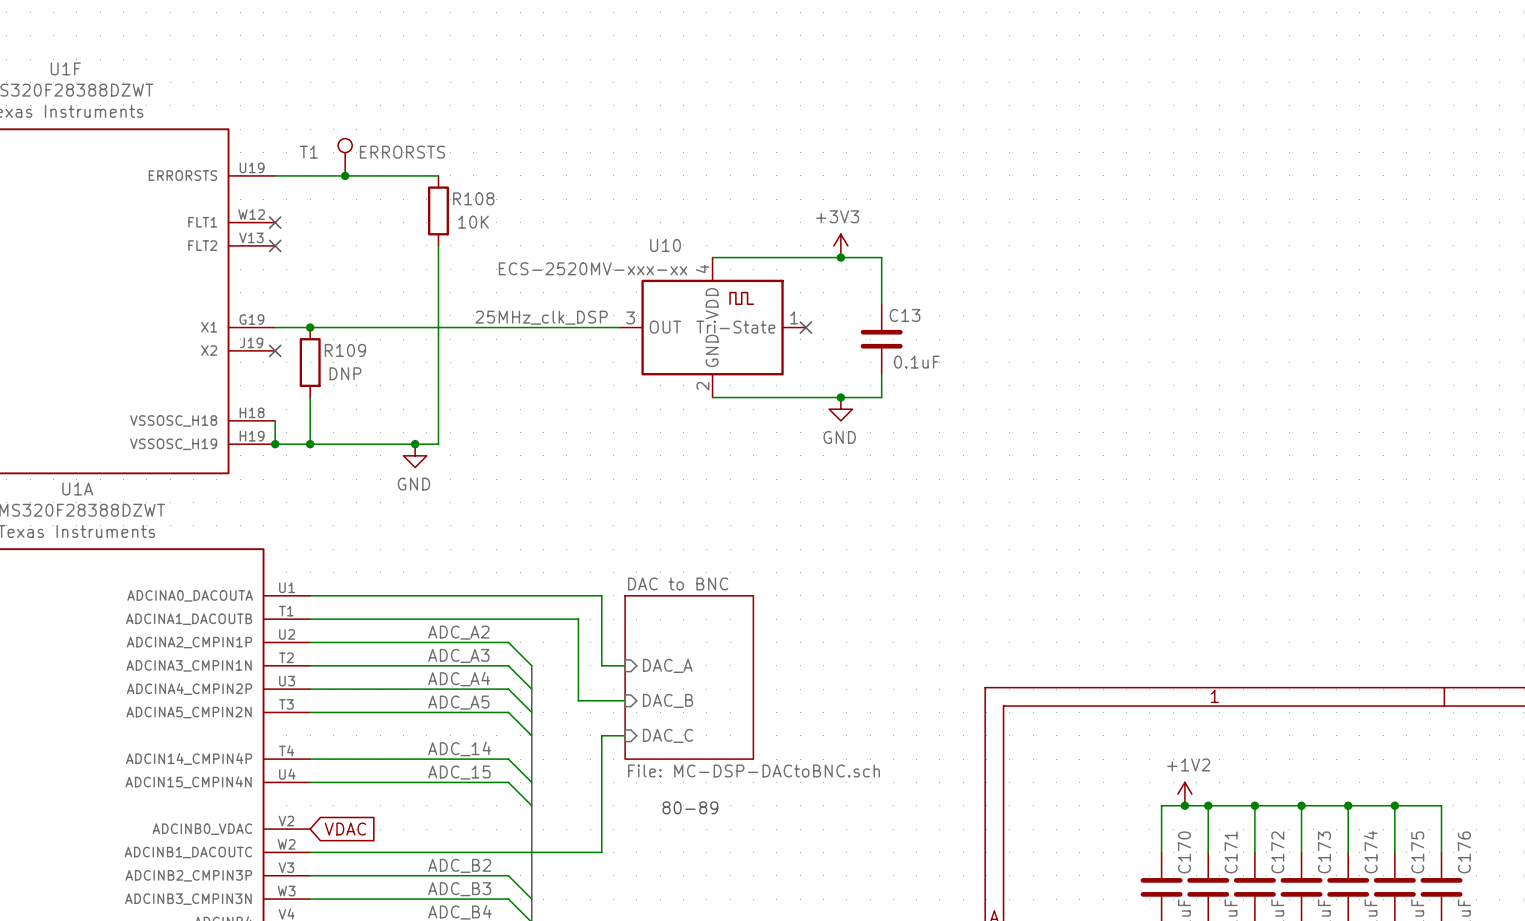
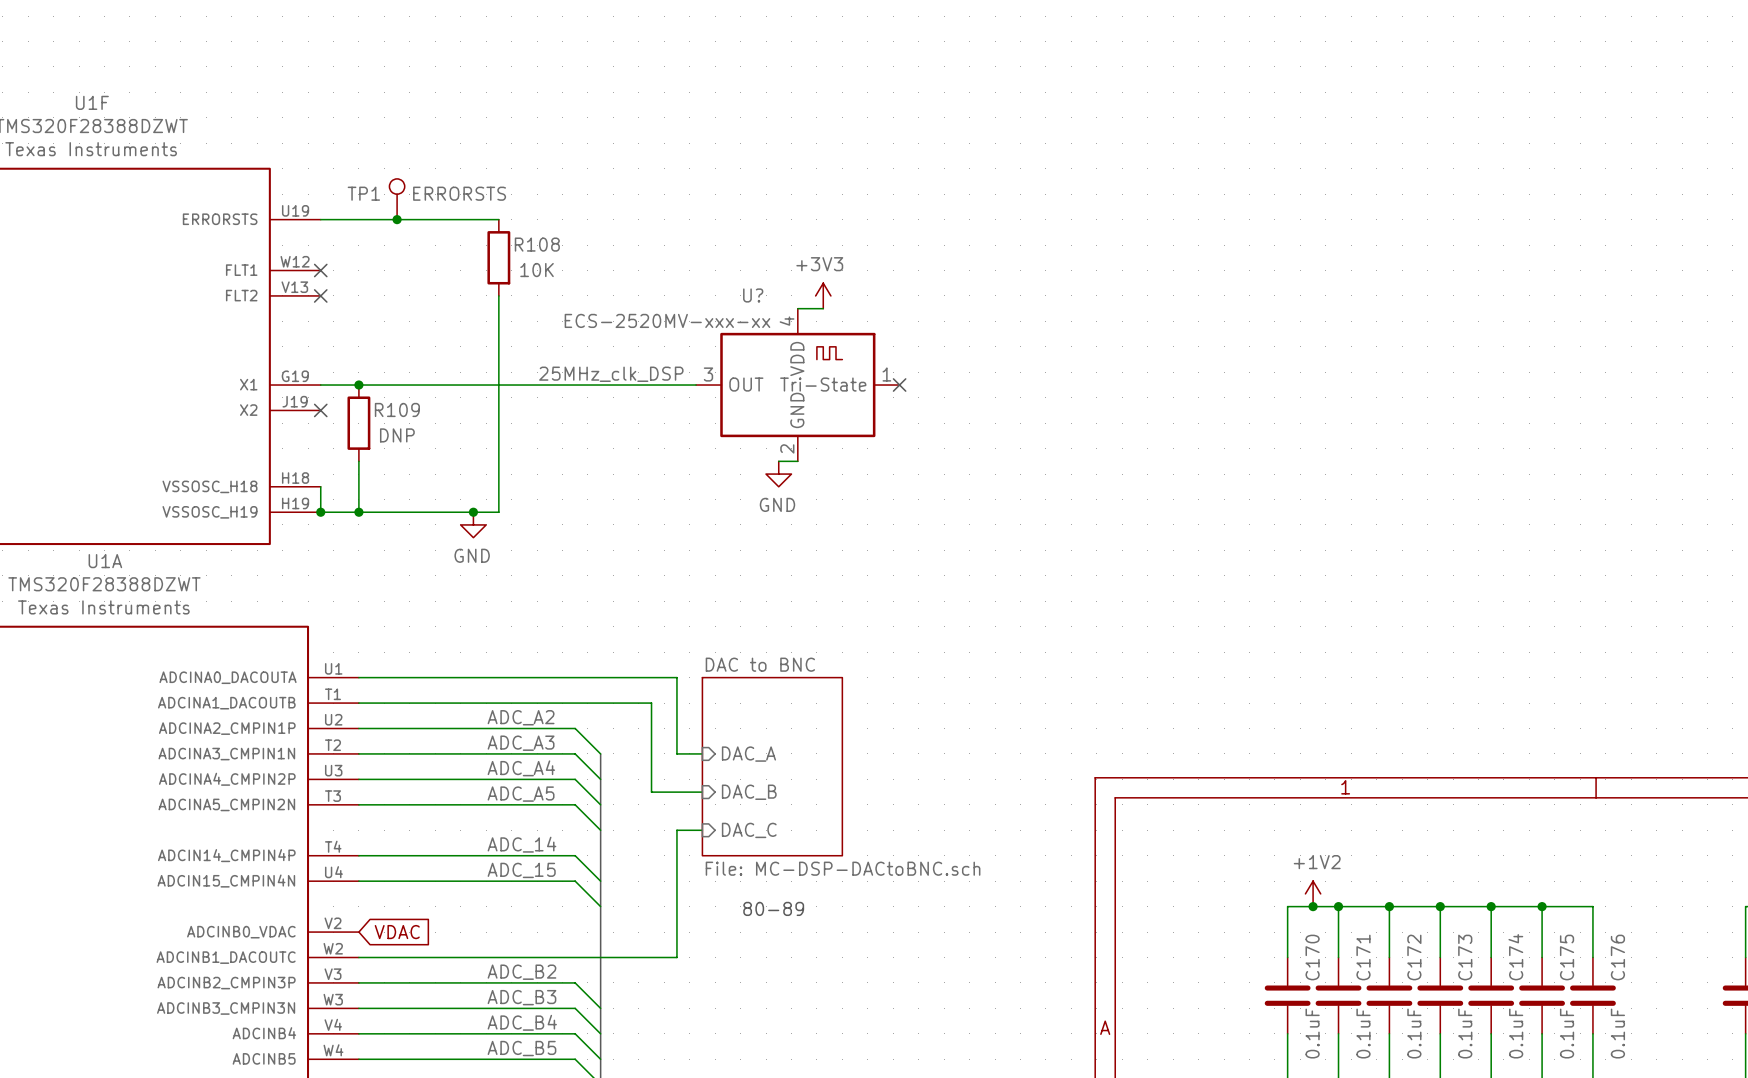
T1 name: T1 (308, 152) -> TP1 (363, 193)
U10 name: U10 (665, 245) -> U? (753, 295)
power symbol position: +3V3 (840, 245) -> +3V3 (823, 295)
wire: (735, 257) (881, 257) (881, 304) -> none
junction: (840, 257) -> none
C13: 0.1uF (881, 339) -> none
wire: (881, 374) (881, 397) (712, 397) -> (778, 461) (797, 461)
junction: (840, 397) -> none
power symbol position: GND (840, 409) -> GND (778, 474)

